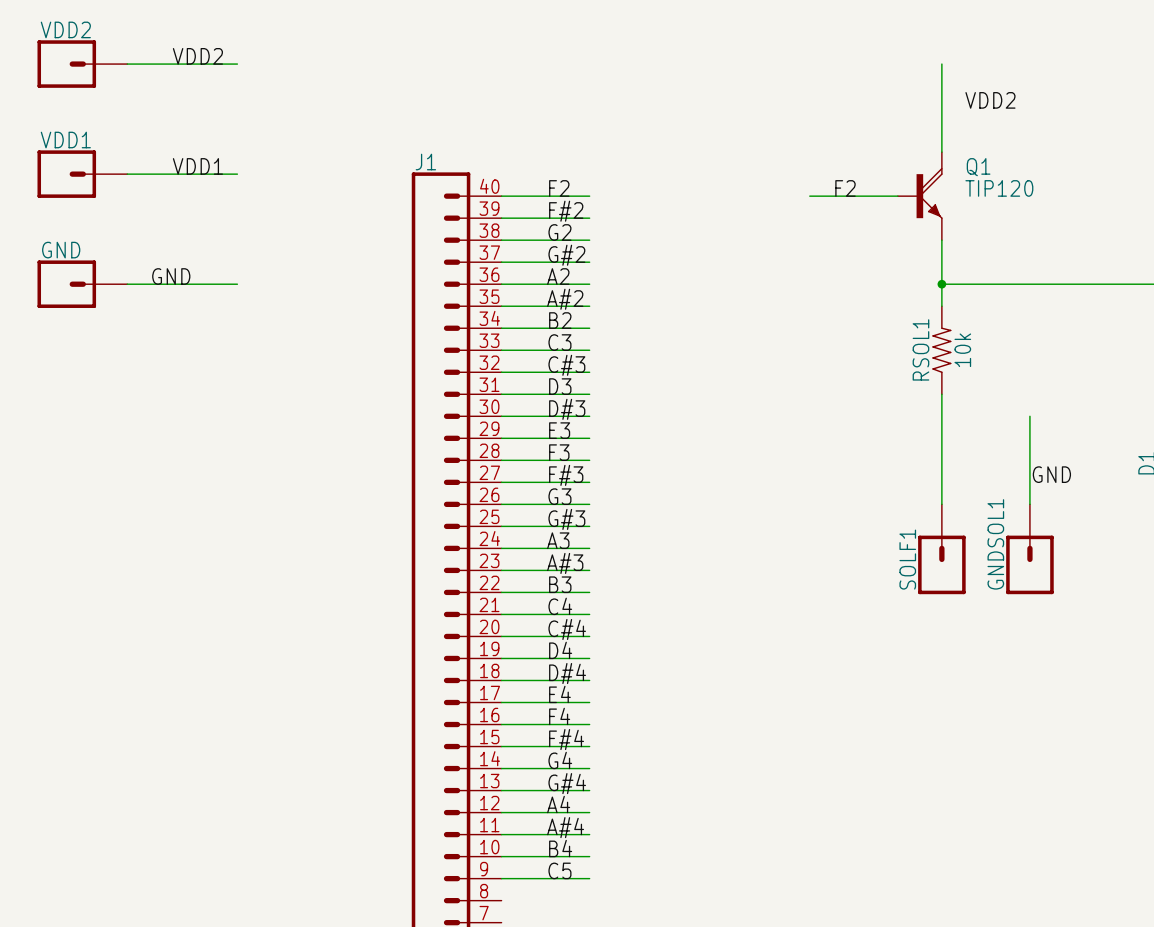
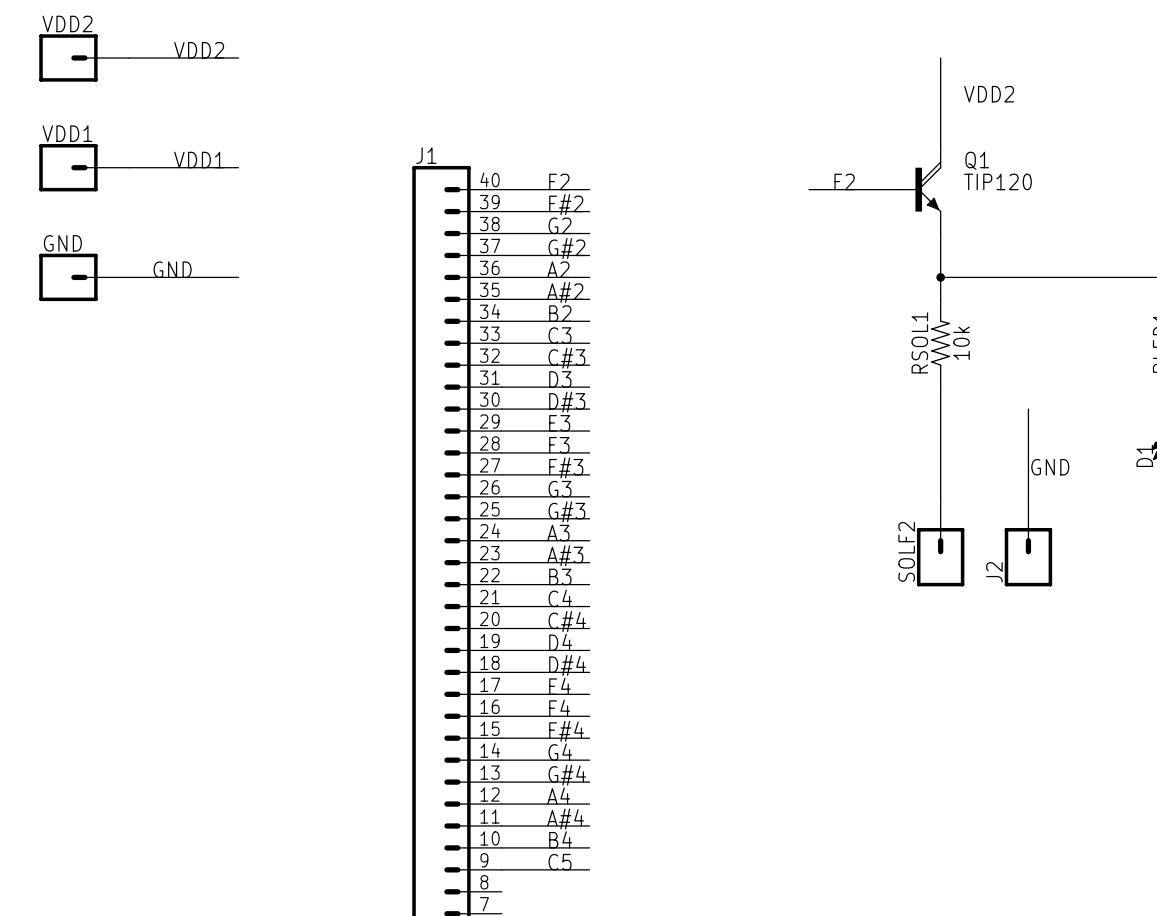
GNDSOL1 name: GNDSOL1 (995, 544) -> J2 (994, 572)
SOLF1 name: SOLF1 (907, 559) -> SOLF2 (906, 551)

